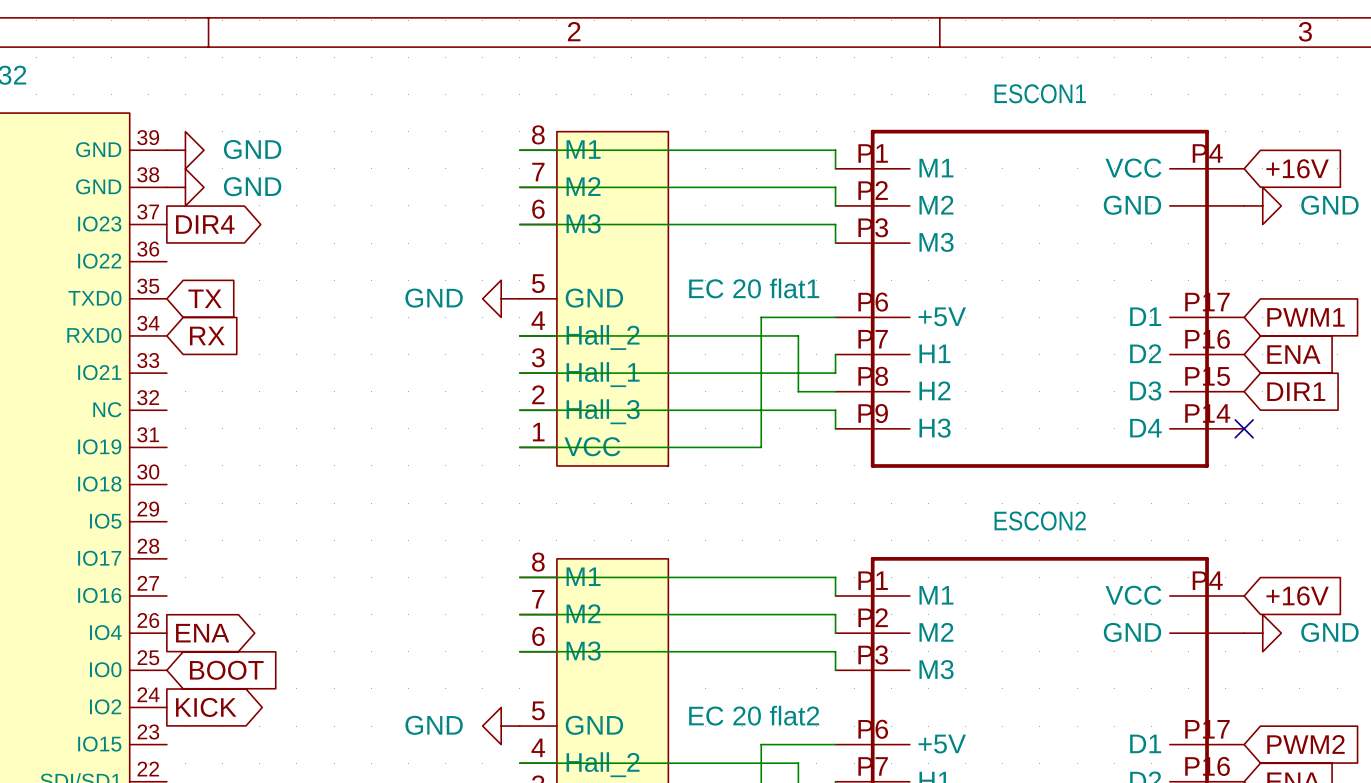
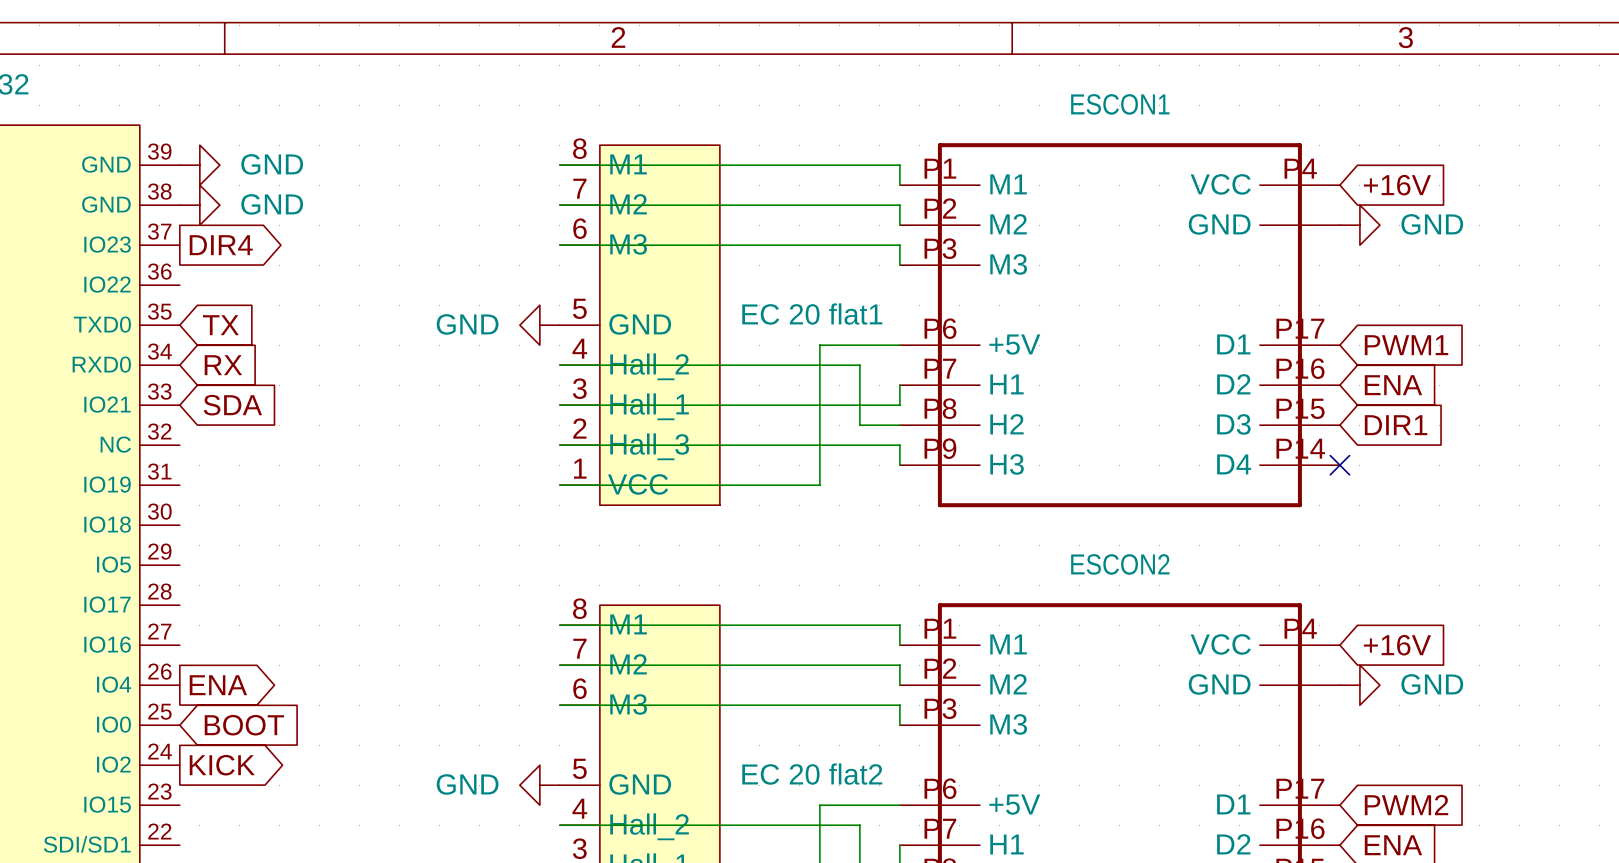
global label: none -> SDA (232, 405)

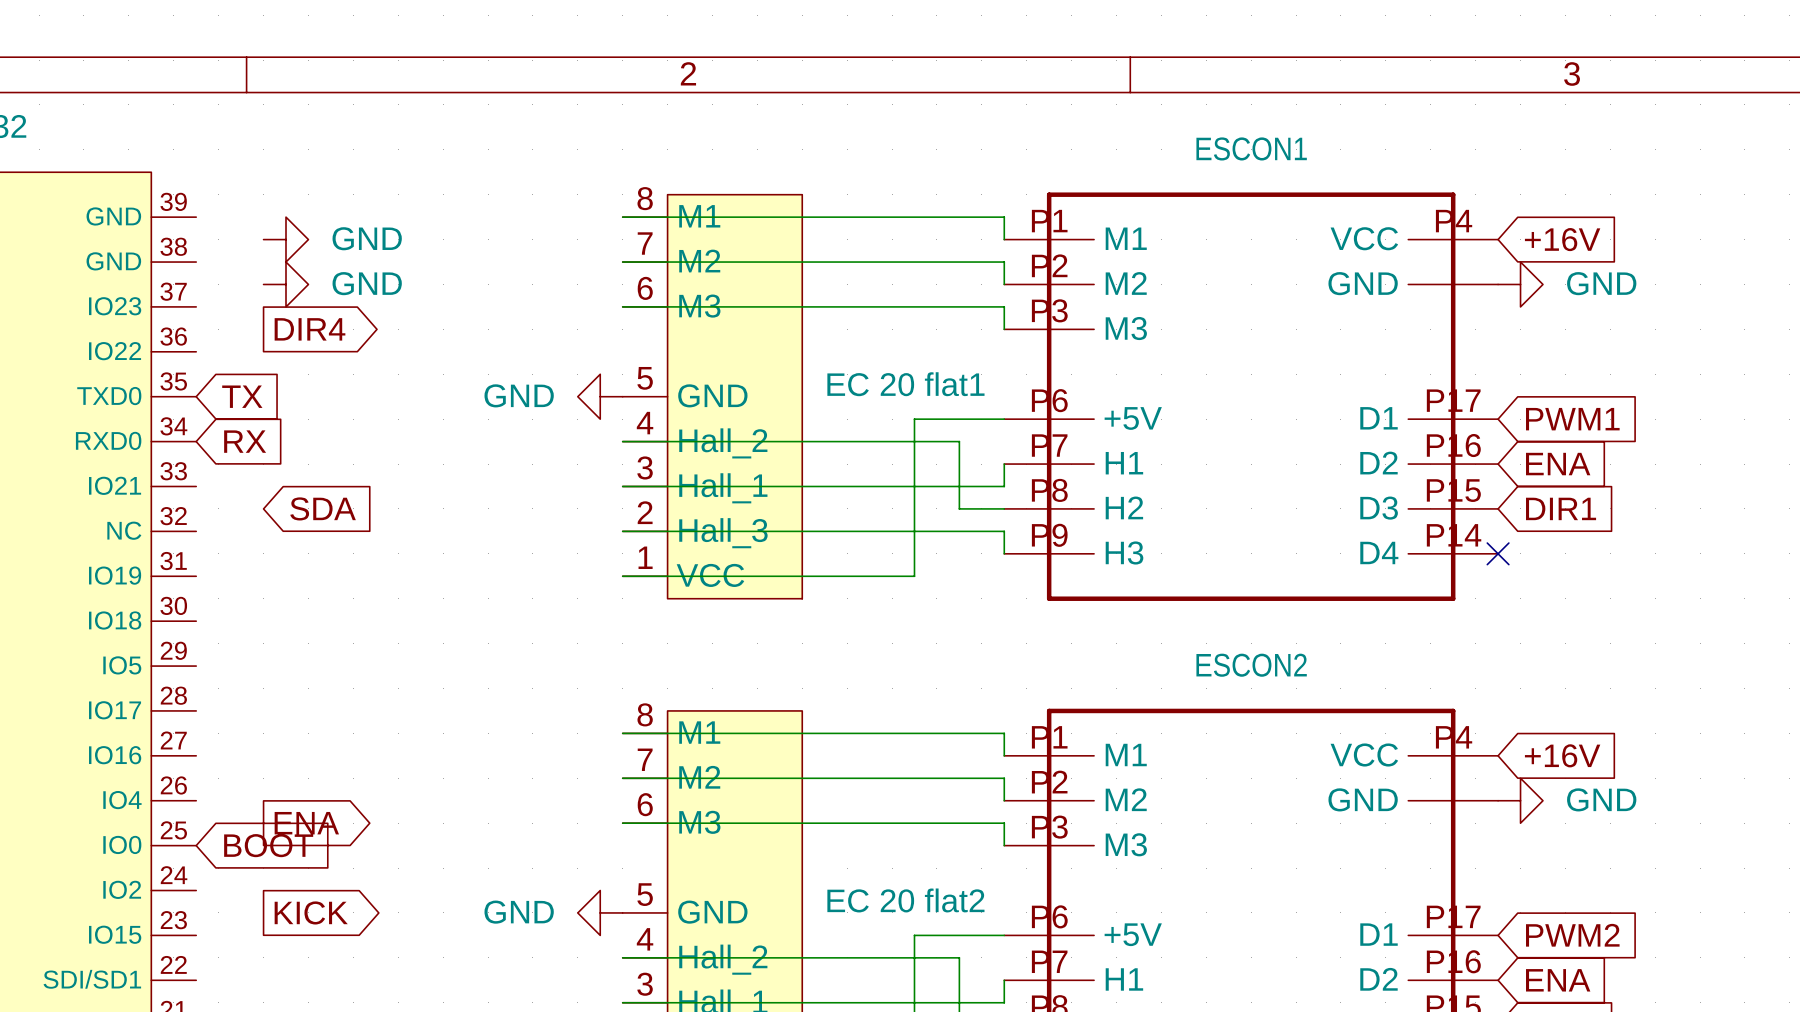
power symbol: GND (199, 165) -> none
power symbol: none -> GND (286, 239)
power symbol: GND (199, 205) -> none
power symbol: none -> GND (286, 284)
global label position: DIR4 (221, 245) -> DIR4 (310, 329)
global label position: SDA (232, 405) -> SDA (323, 508)
global label position: ENA (218, 685) -> ENA (306, 823)
global label position: KICK (222, 765) -> KICK (311, 912)

